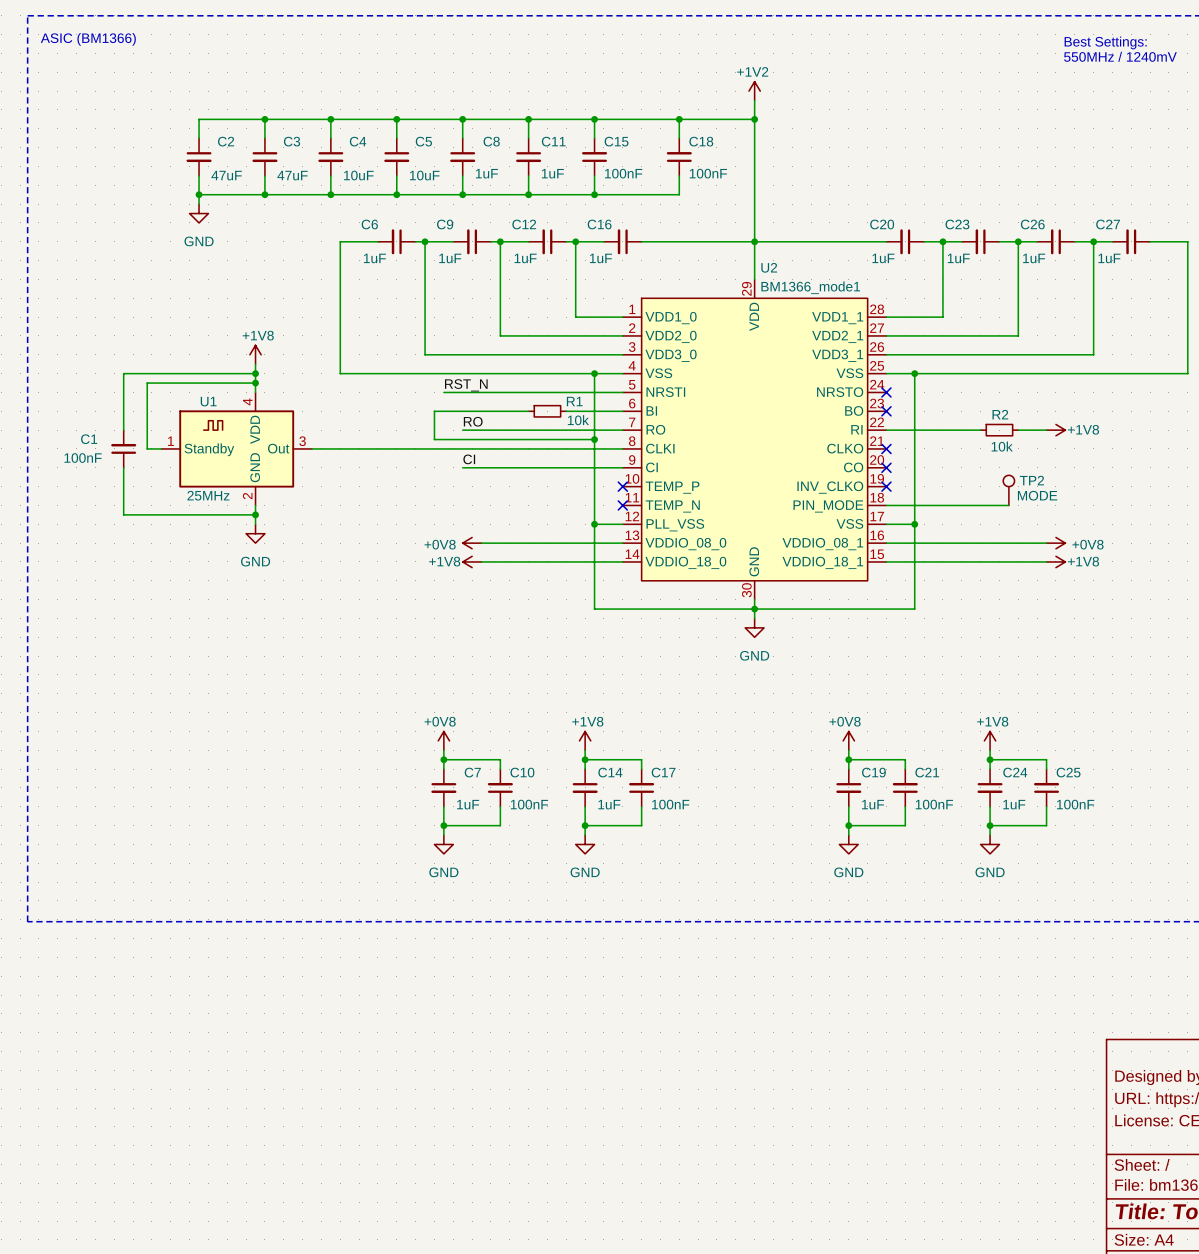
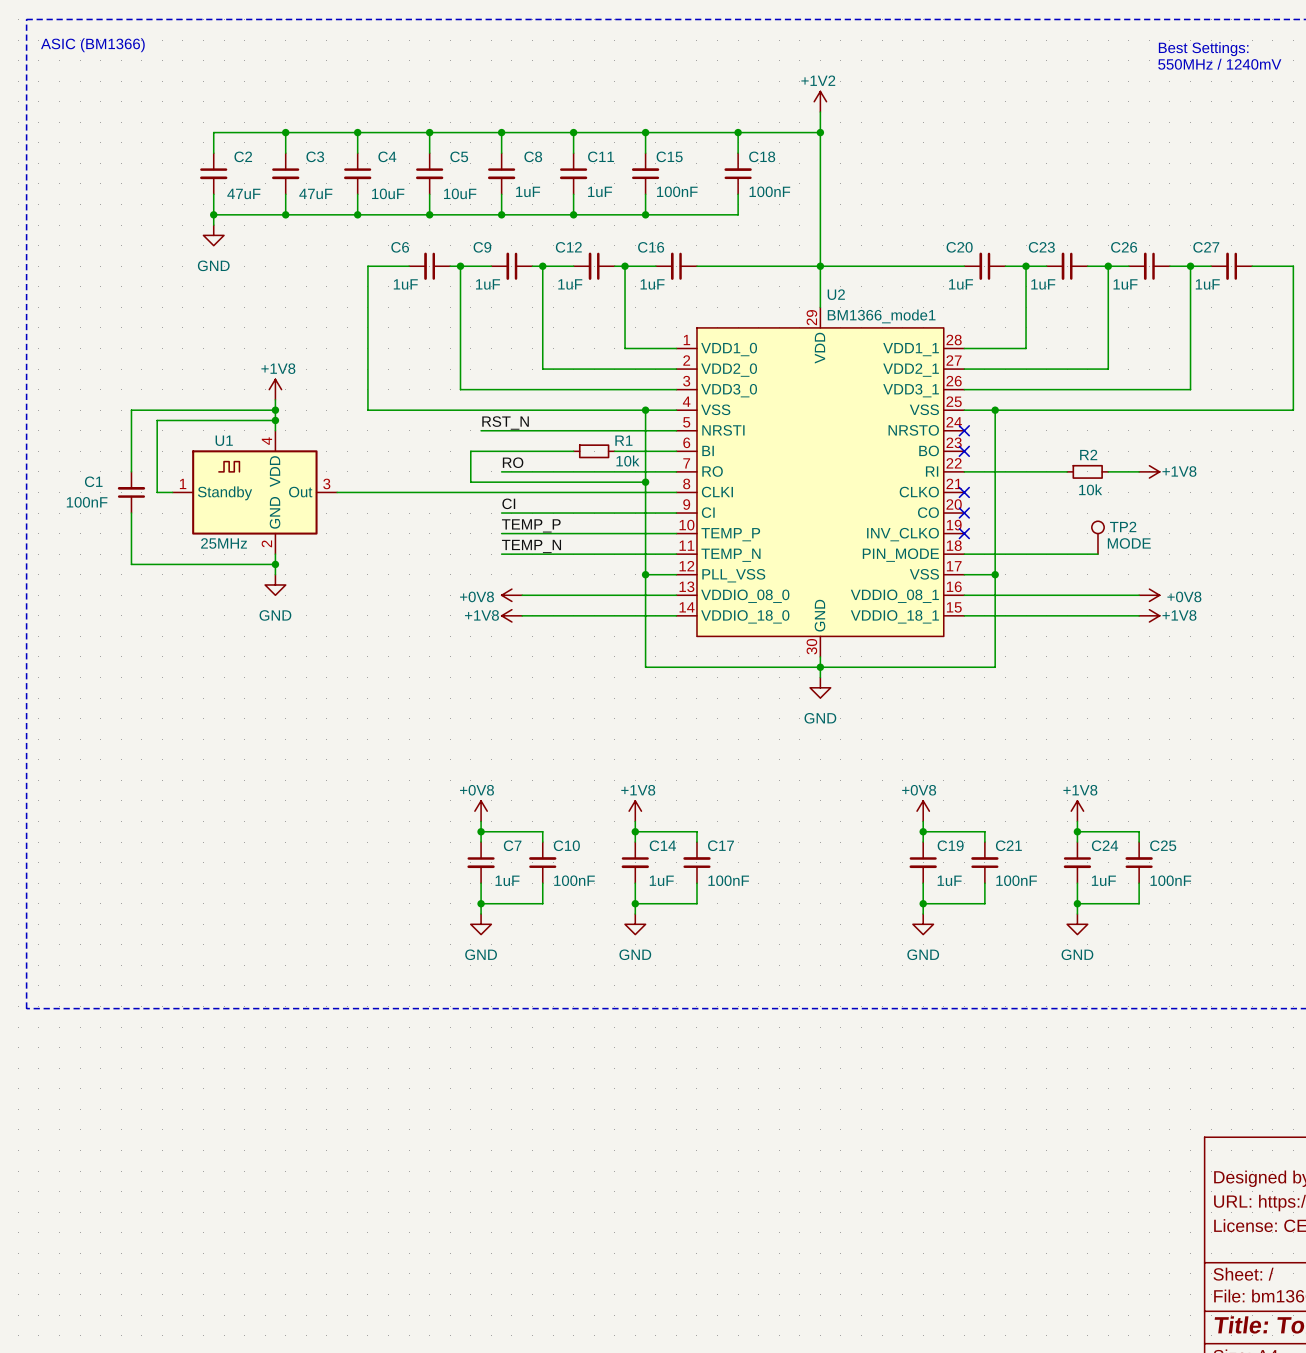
label: none -> TEMP_P (531, 525)
wire: none -> (501, 533) (676, 533)
no-connect mark: (622, 486) -> none
label: none -> TEMP_N (531, 546)
wire: none -> (501, 554) (676, 554)
no-connect mark: (622, 505) -> none

